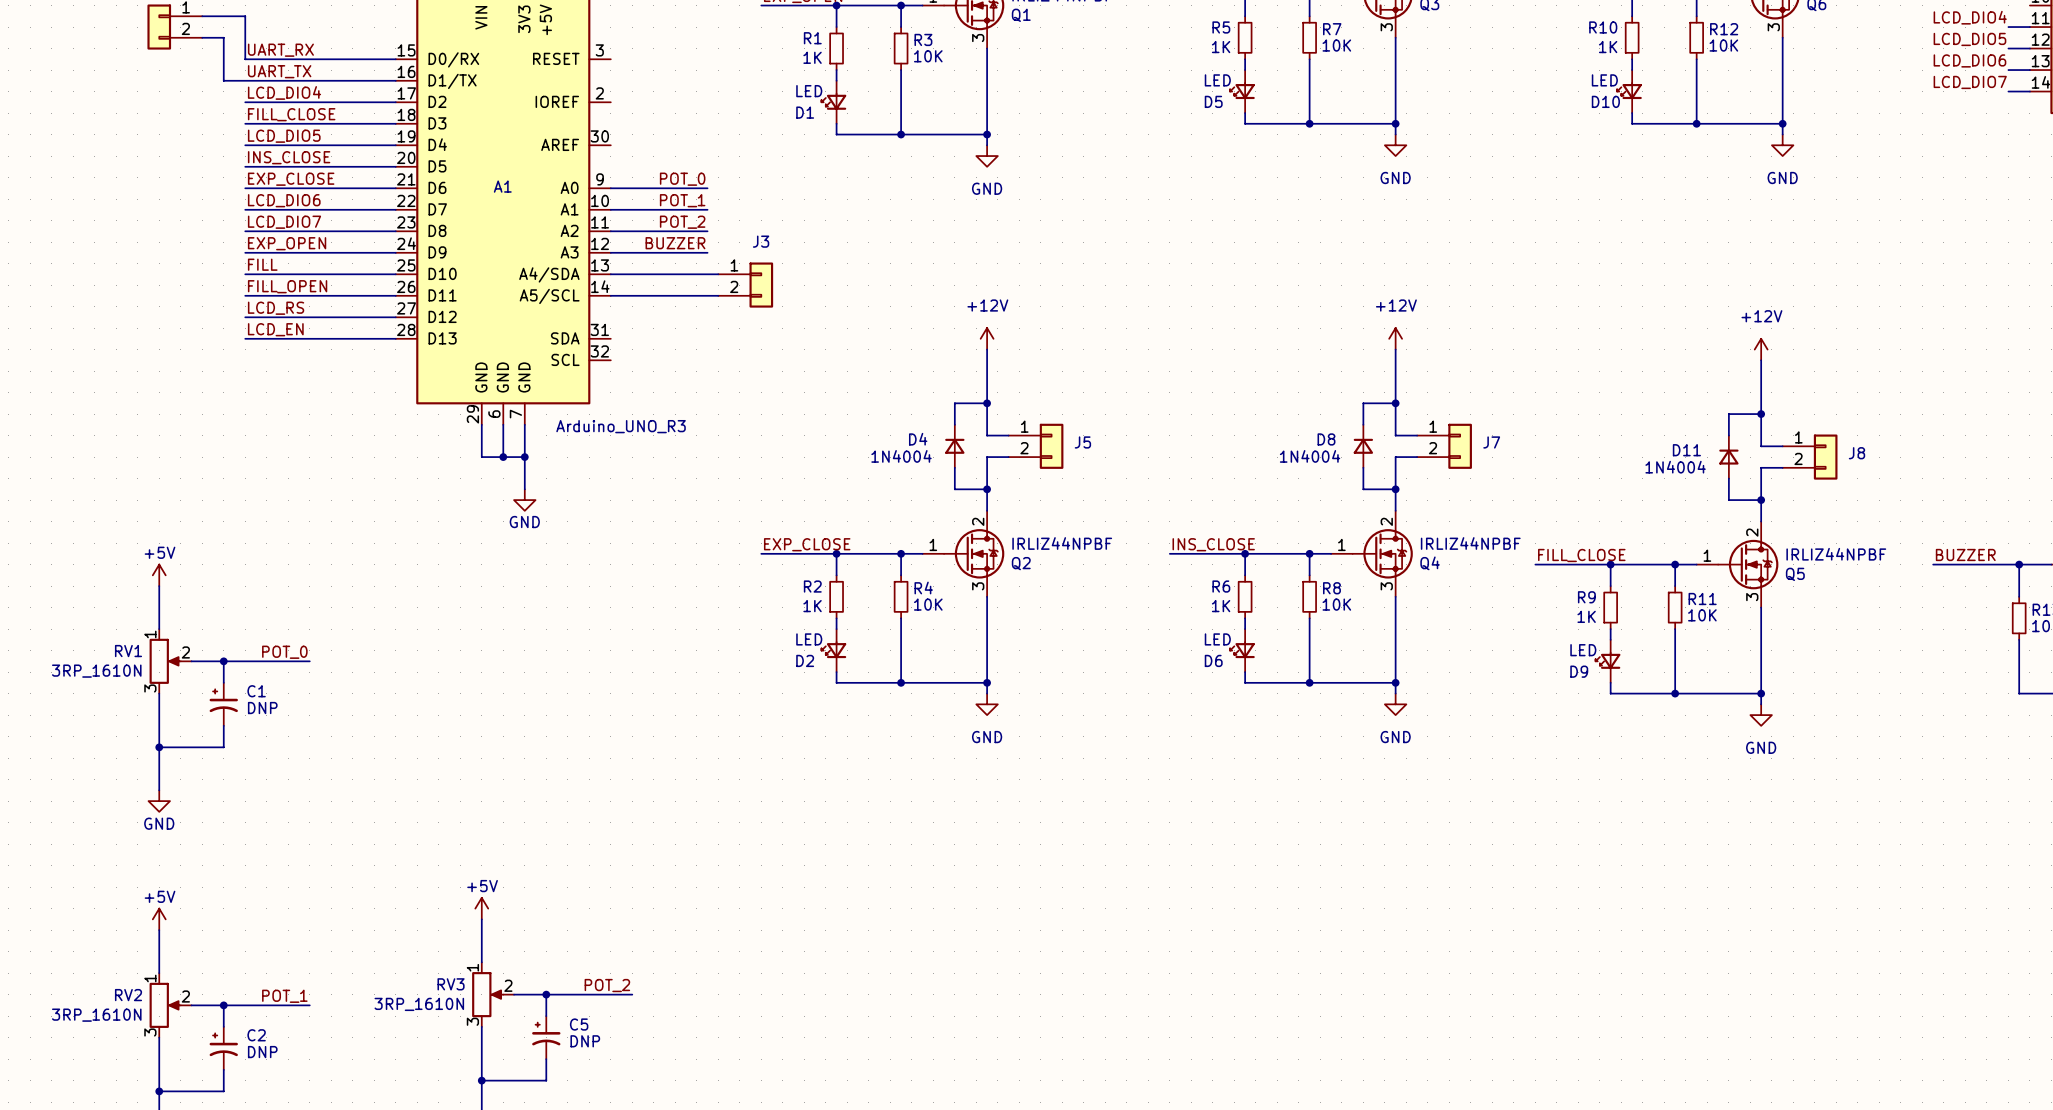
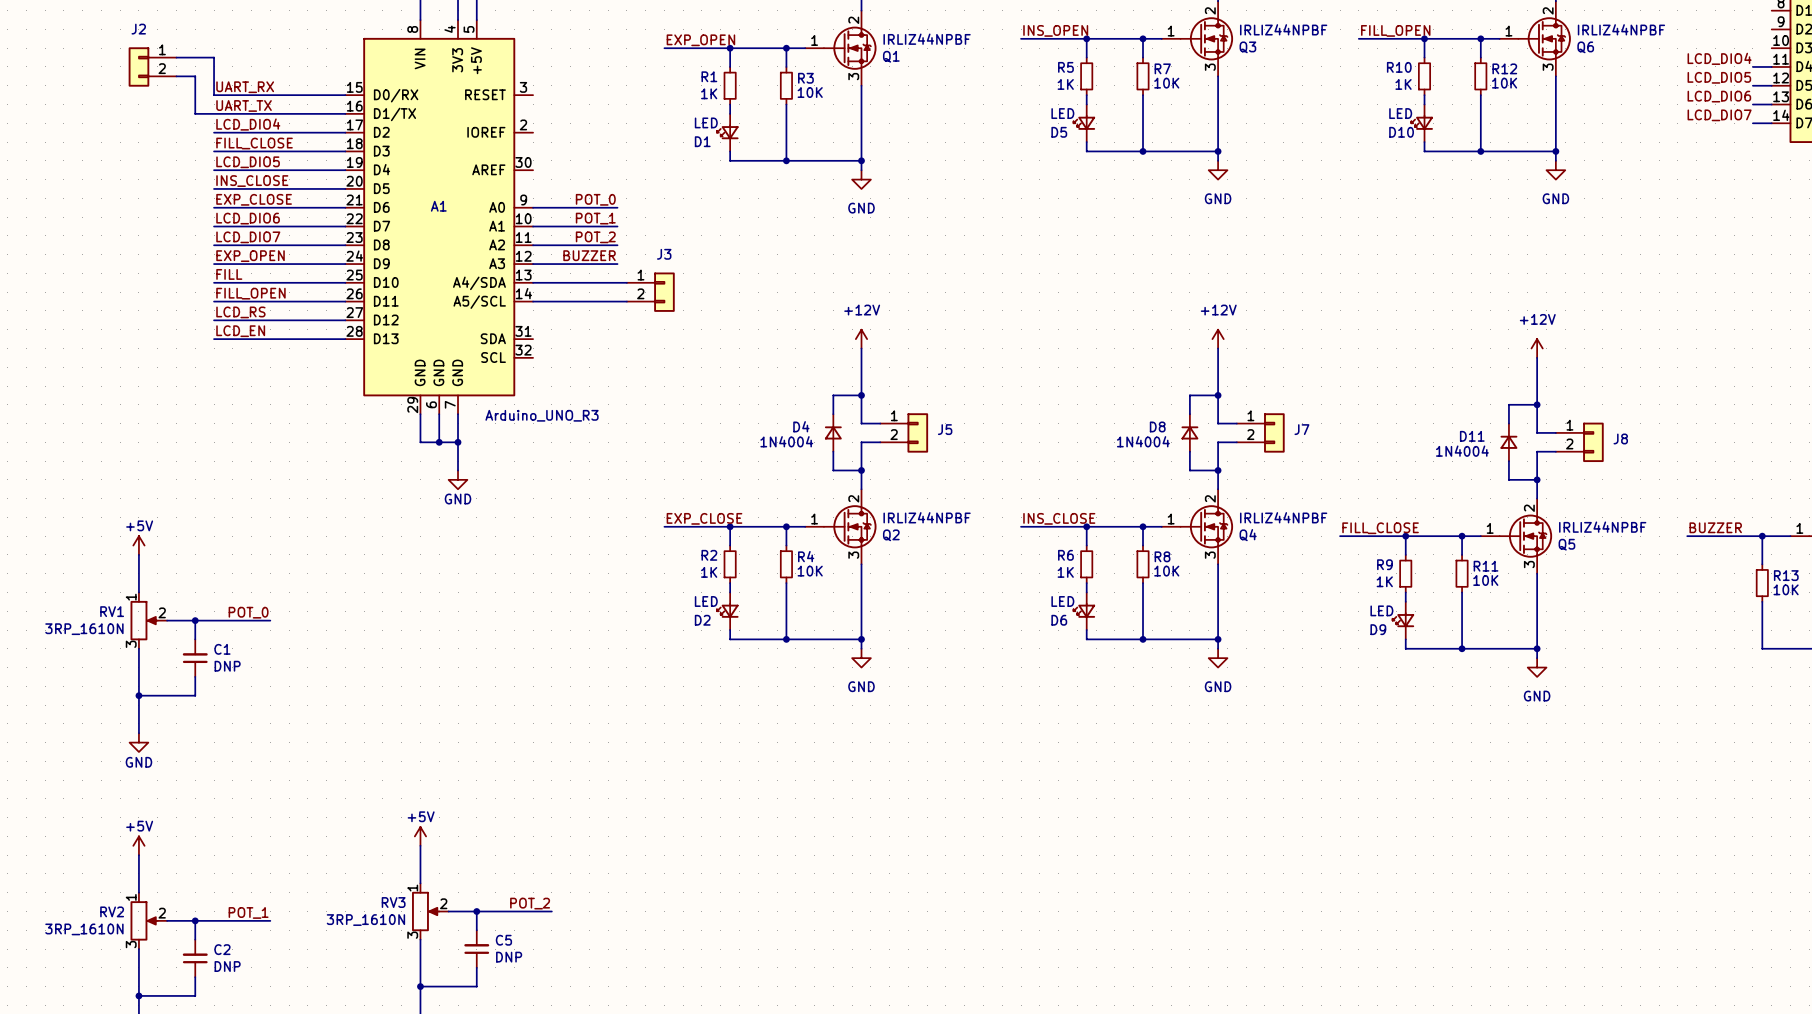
C1 symbol: [209, 682, 238, 726] -> [182, 639, 208, 677]
C5 symbol: [532, 1016, 561, 1060] -> [464, 930, 490, 968]
C2 symbol: [209, 1026, 238, 1070] -> [182, 939, 208, 978]

